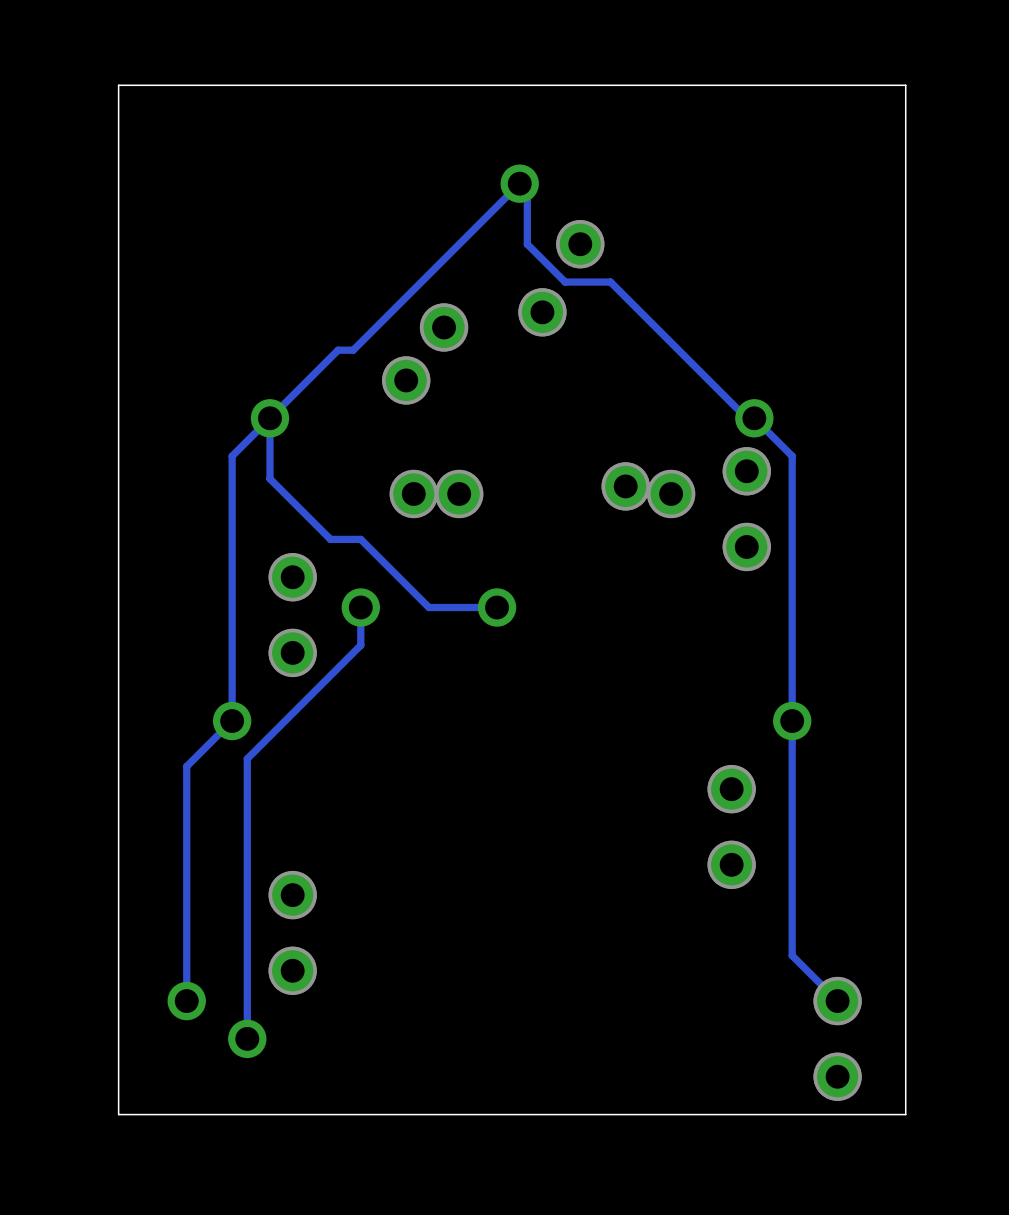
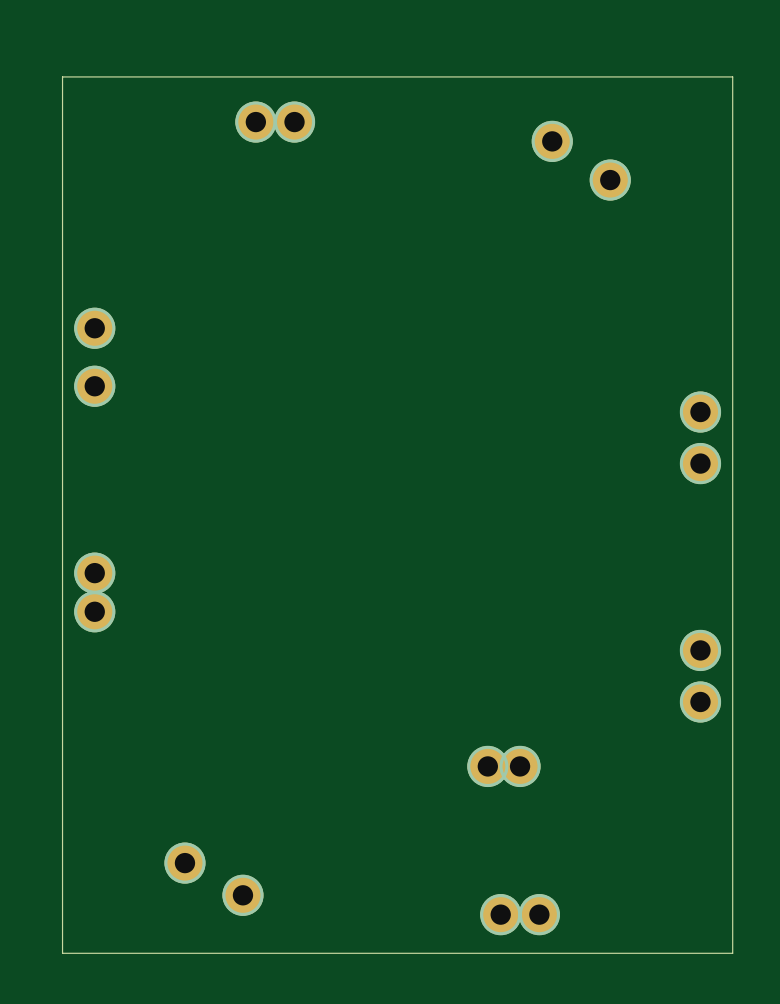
part: none -> (255, 122)
part: none -> (294, 122)
part: none -> (552, 141)
via: (519, 183) -> none
part: none -> (610, 180)
part: (580, 244) -> none
part: (542, 312) -> none
part: (444, 327) -> none
part: none -> (94, 328)
part: (406, 380) -> none
track: (269, 418) (269, 478) (330, 539) (360, 539) (428, 607) (497, 607) -> none
via: (269, 418) -> none
via: (754, 418) -> none
part: none -> (94, 386)
part: (746, 471) -> none
part: none -> (700, 412)
part: (625, 486) -> none
part: (413, 493) -> none
part: (459, 493) -> none
part: (671, 493) -> none
part: none -> (700, 463)
part: (746, 546) -> none
part: (292, 577) -> none
track: (360, 607) (360, 645) (247, 758) (247, 1038) -> none
via: (360, 607) -> none
via: (497, 607) -> none
part: (292, 652) -> none
part: none -> (94, 573)
part: none -> (94, 611)
via: (232, 721) -> none
via: (792, 721) -> none
part: none -> (700, 650)
part: (731, 789) -> none
part: none -> (700, 701)
part: (731, 864) -> none
part: (292, 895) -> none
part: none -> (487, 766)
part: none -> (520, 766)
part: (292, 970) -> none
via: (186, 1001) -> none
track: (837, 1001) (792, 955) (792, 456) (754, 418) (746, 418) (610, 282) (565, 282) (527, 244) (527, 191) (519, 183) (353, 350) (338, 350) (232, 456) (232, 721) (186, 766) (186, 1001) -> none
part: (837, 1001) -> none
part: none -> (184, 863)
via: (247, 1038) -> none
part: none -> (242, 895)
part: none -> (500, 914)
part: none -> (539, 914)
part: (837, 1076) -> none

